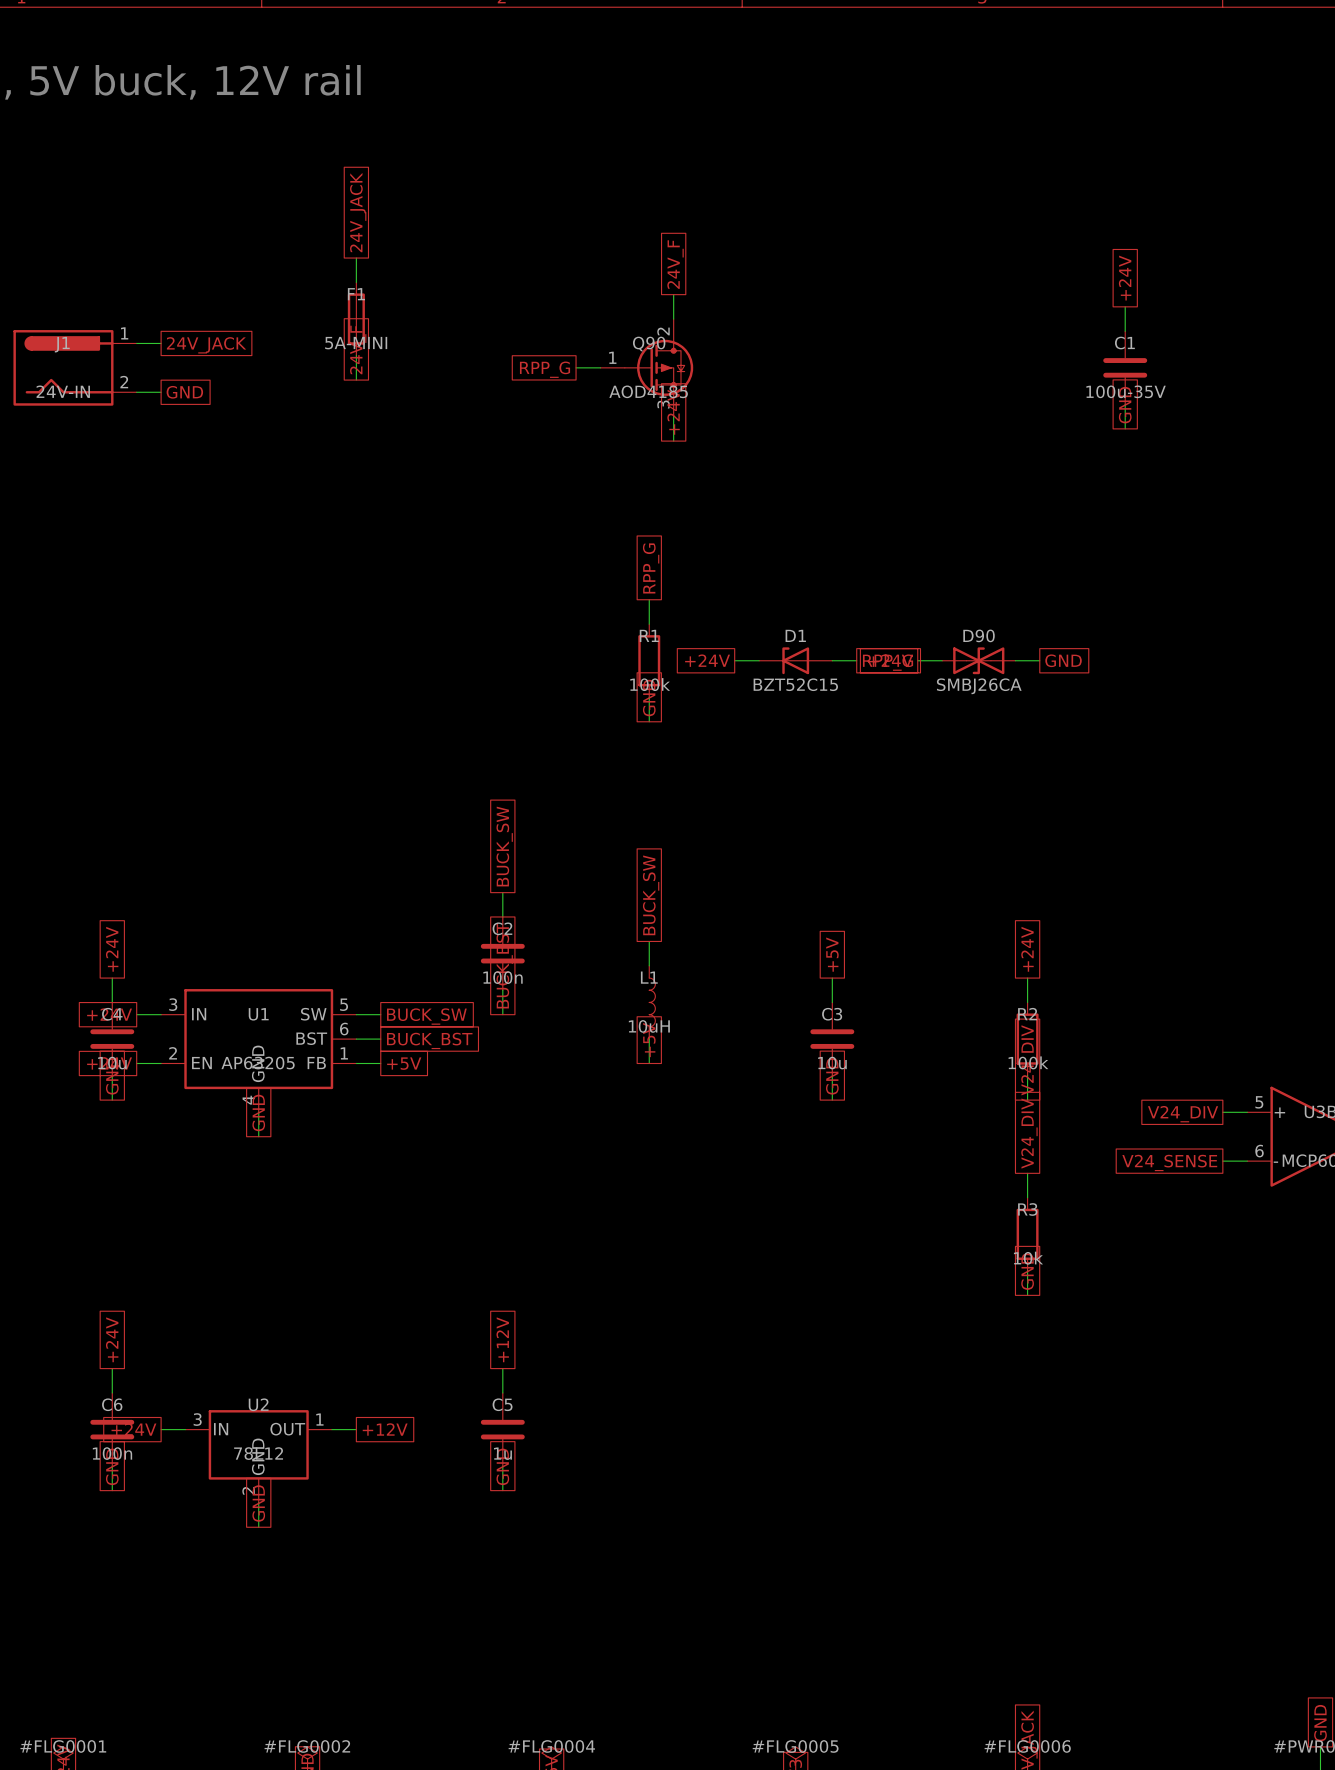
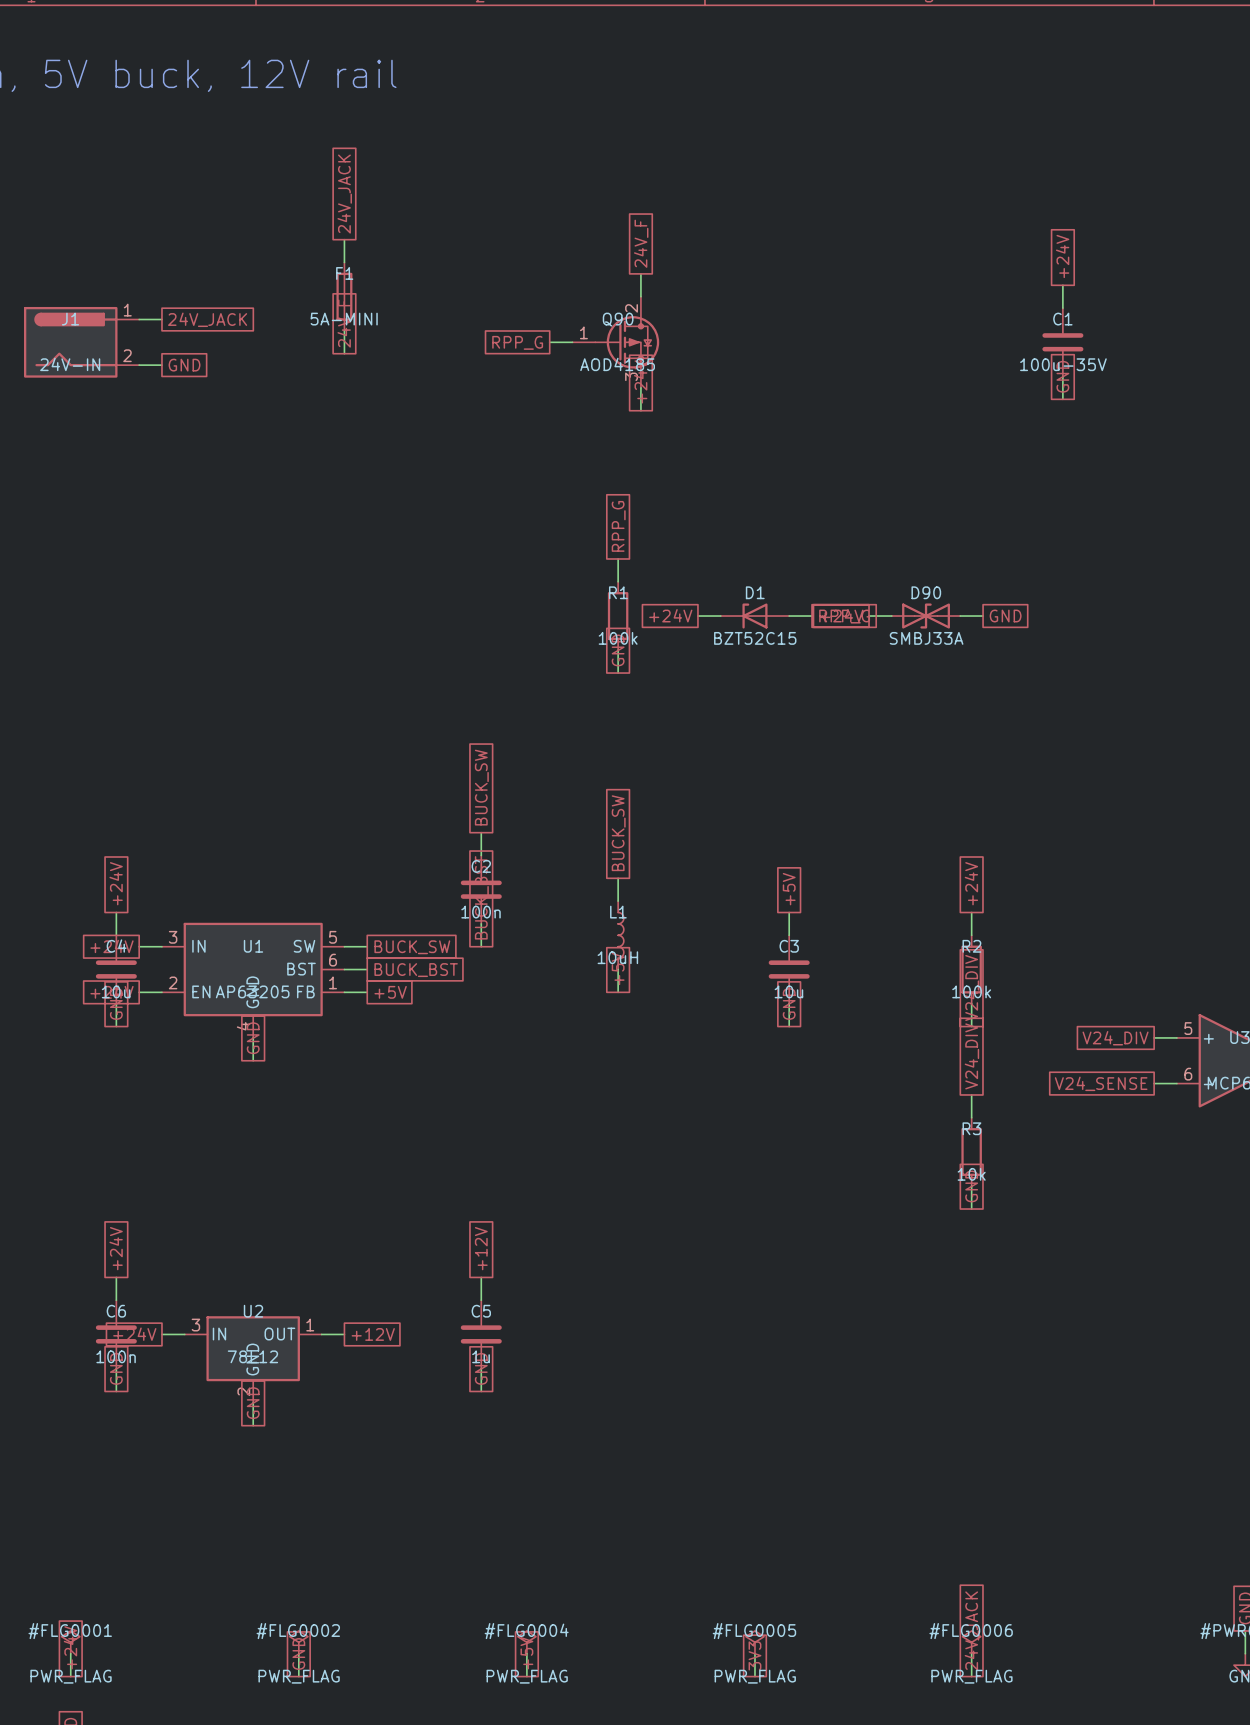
D90 value: SMBJ26CA (979, 686) -> SMBJ33A (926, 638)

